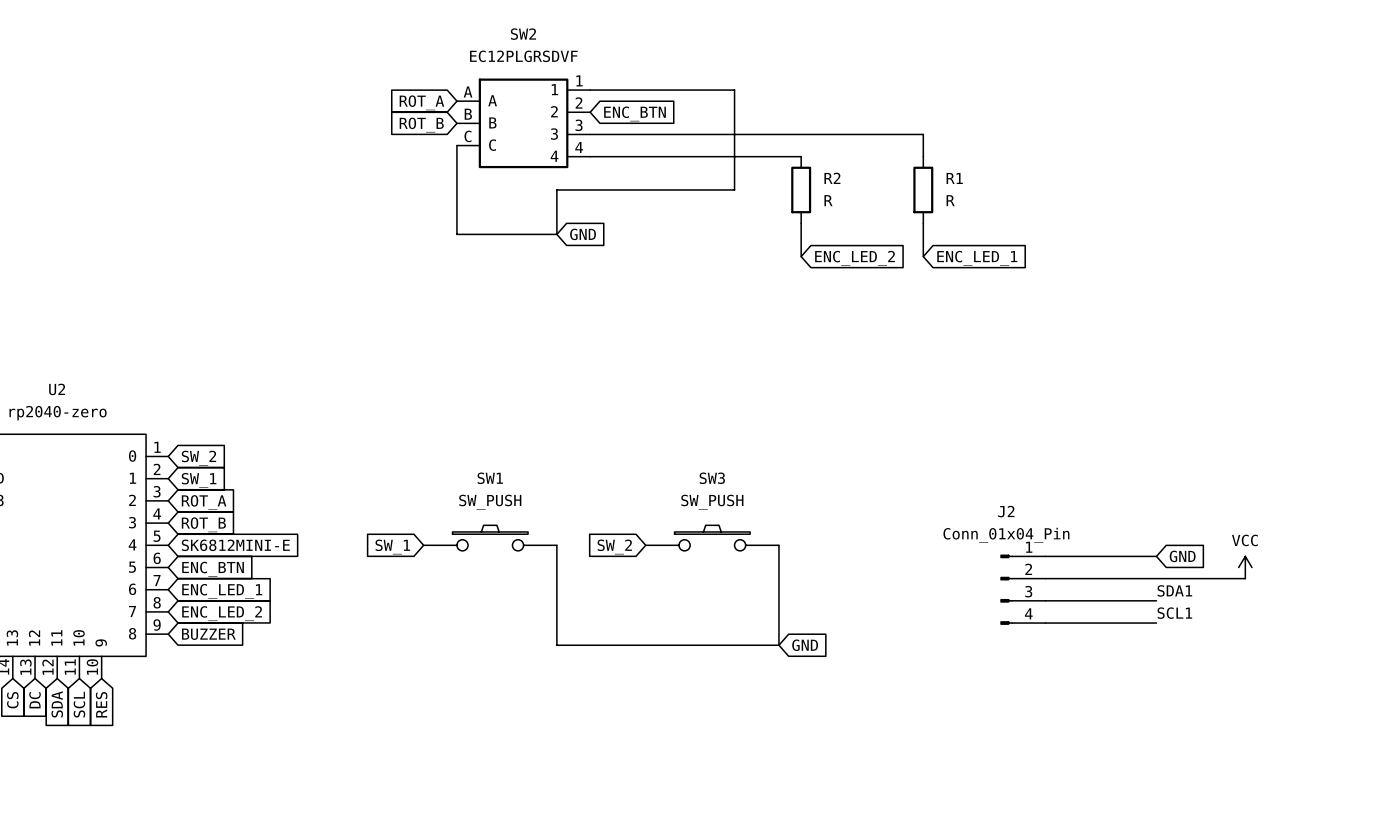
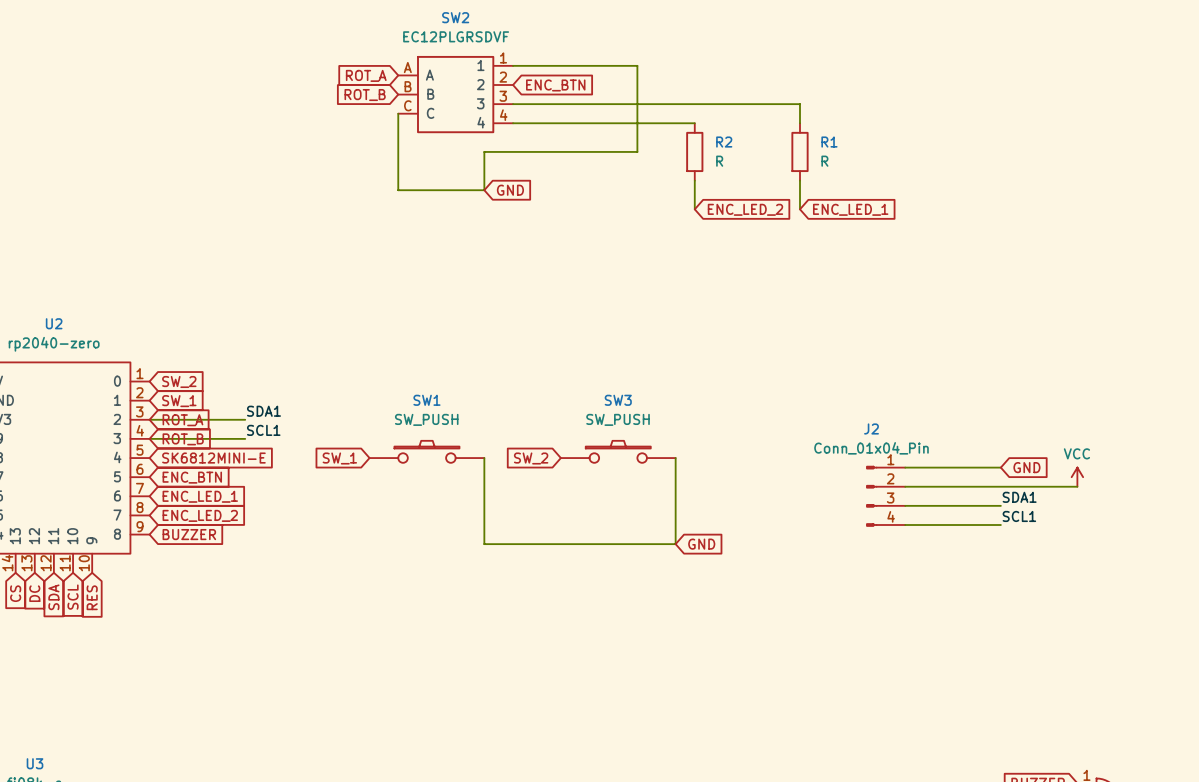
label: none -> SDA1 (263, 411)
wire: none -> (149, 419) (245, 419)
label: none -> SCL1 (263, 430)
wire: none -> (149, 438) (245, 438)

